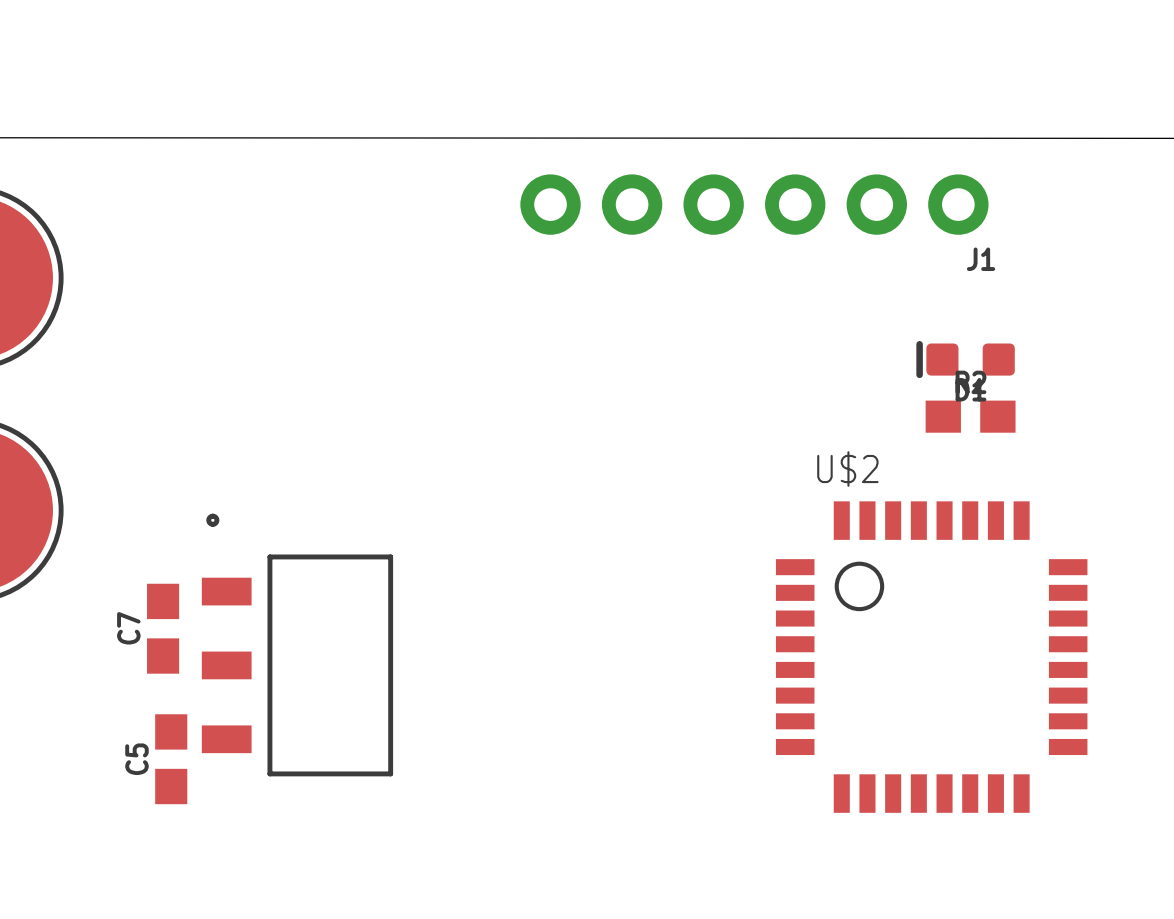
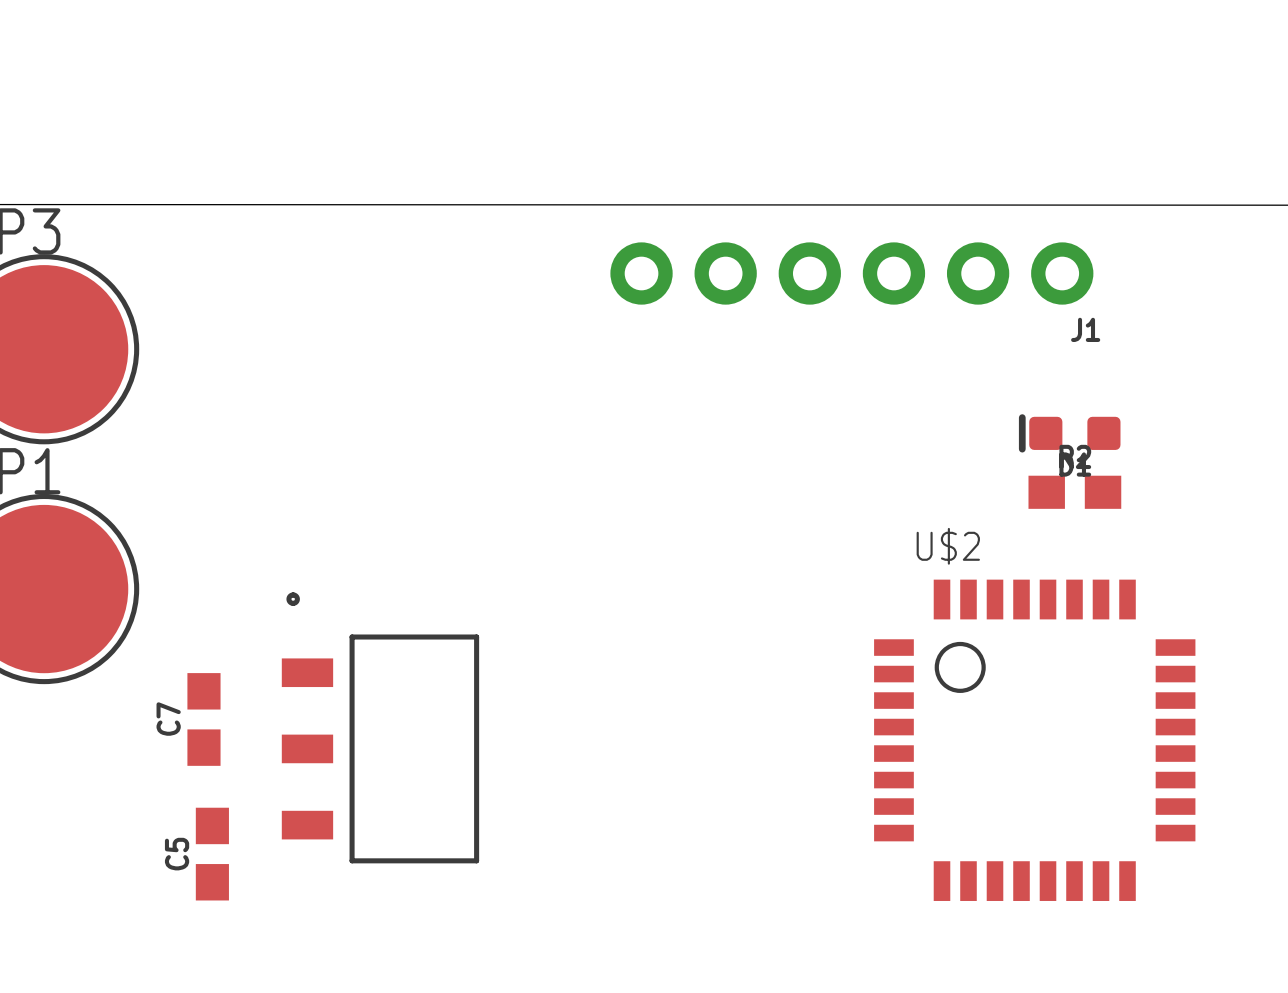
C7 position: (163, 628) -> (203, 719)
C5 position: (171, 759) -> (212, 854)

